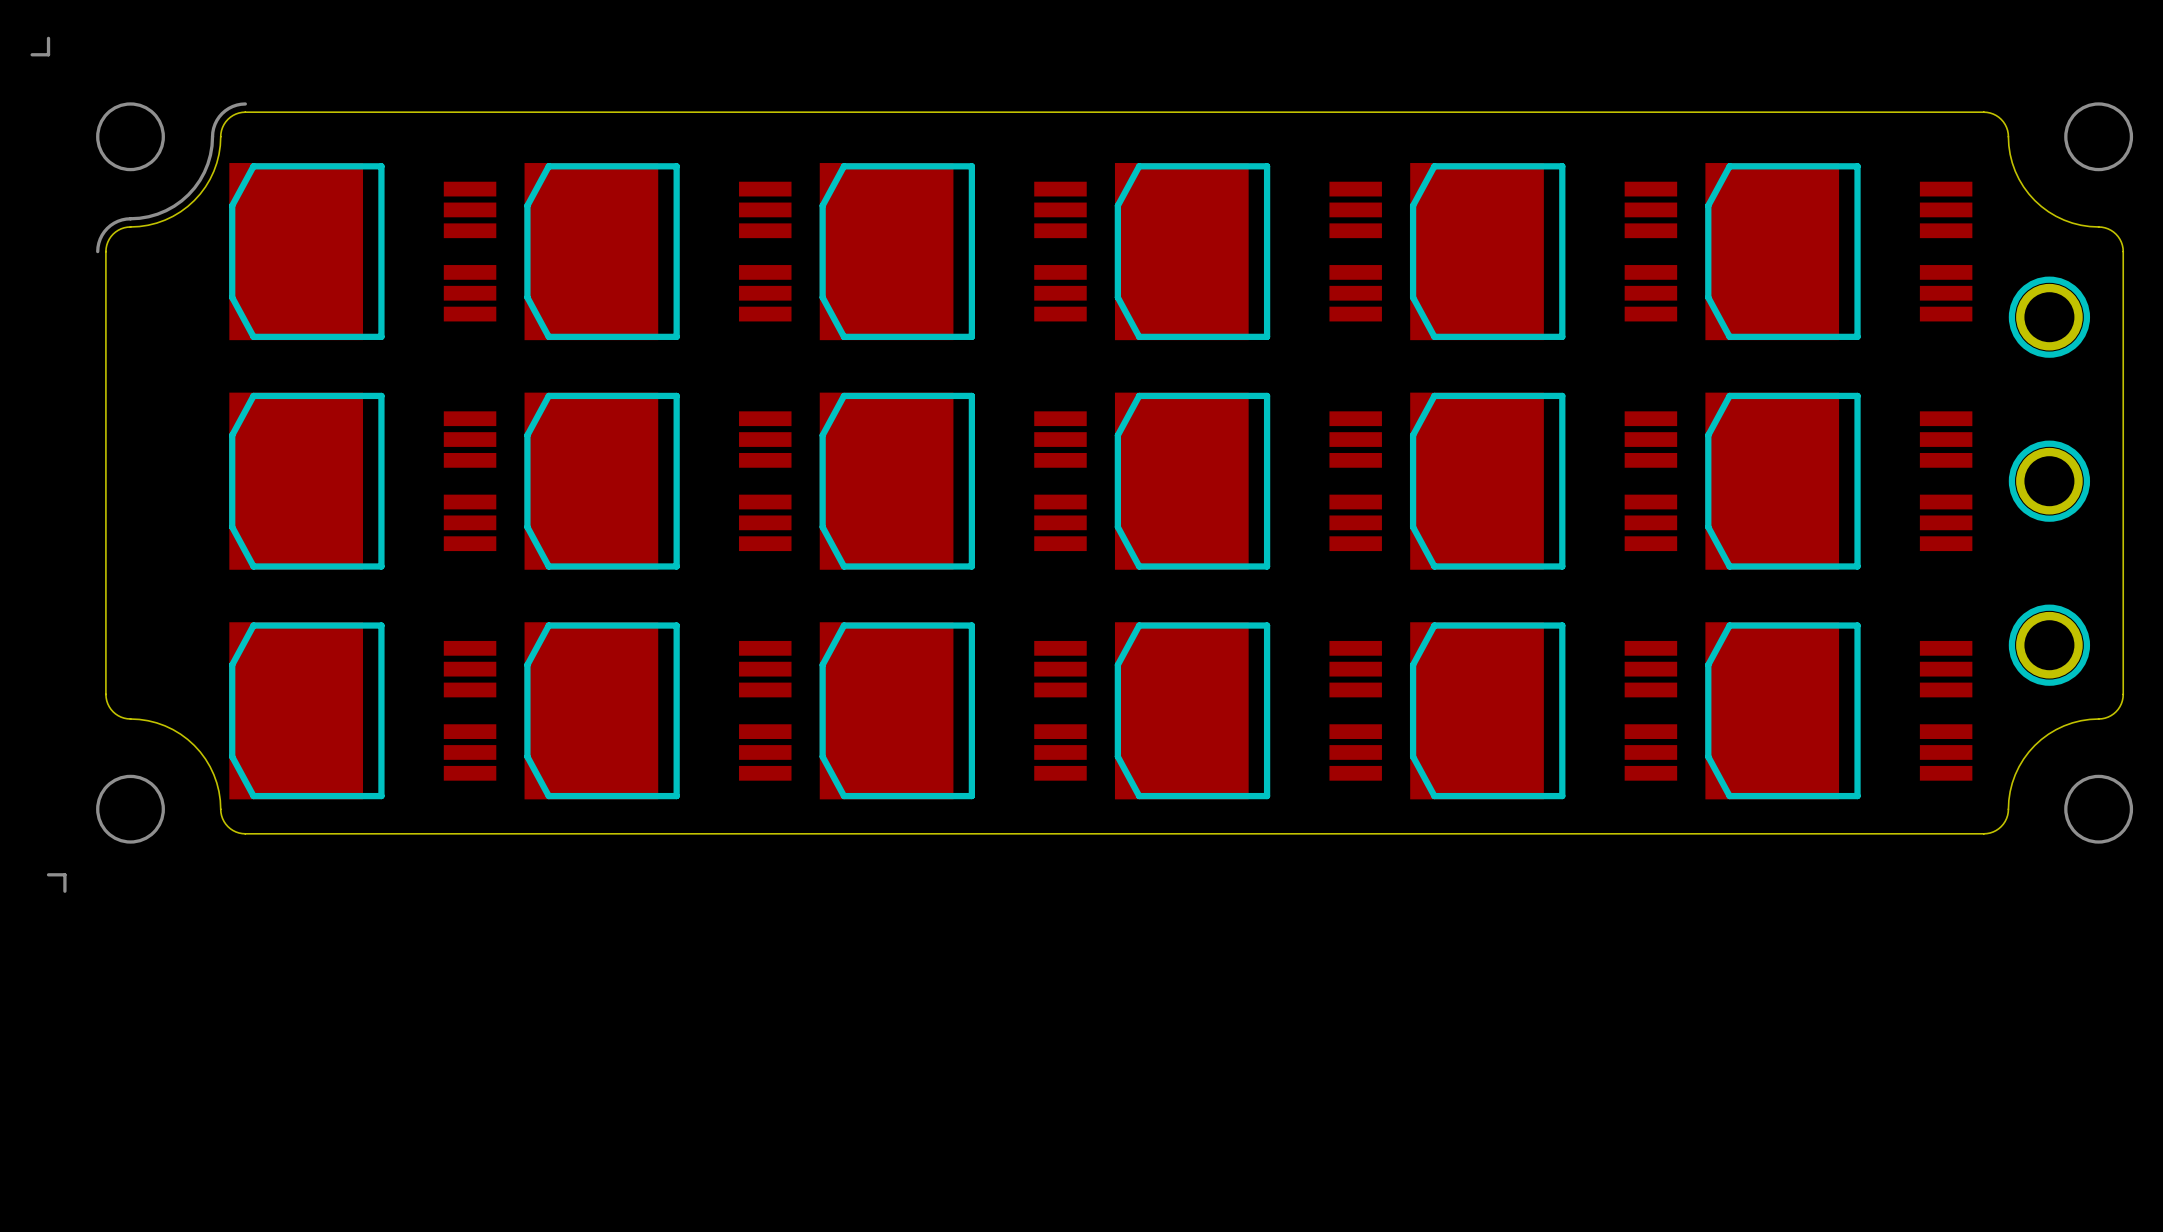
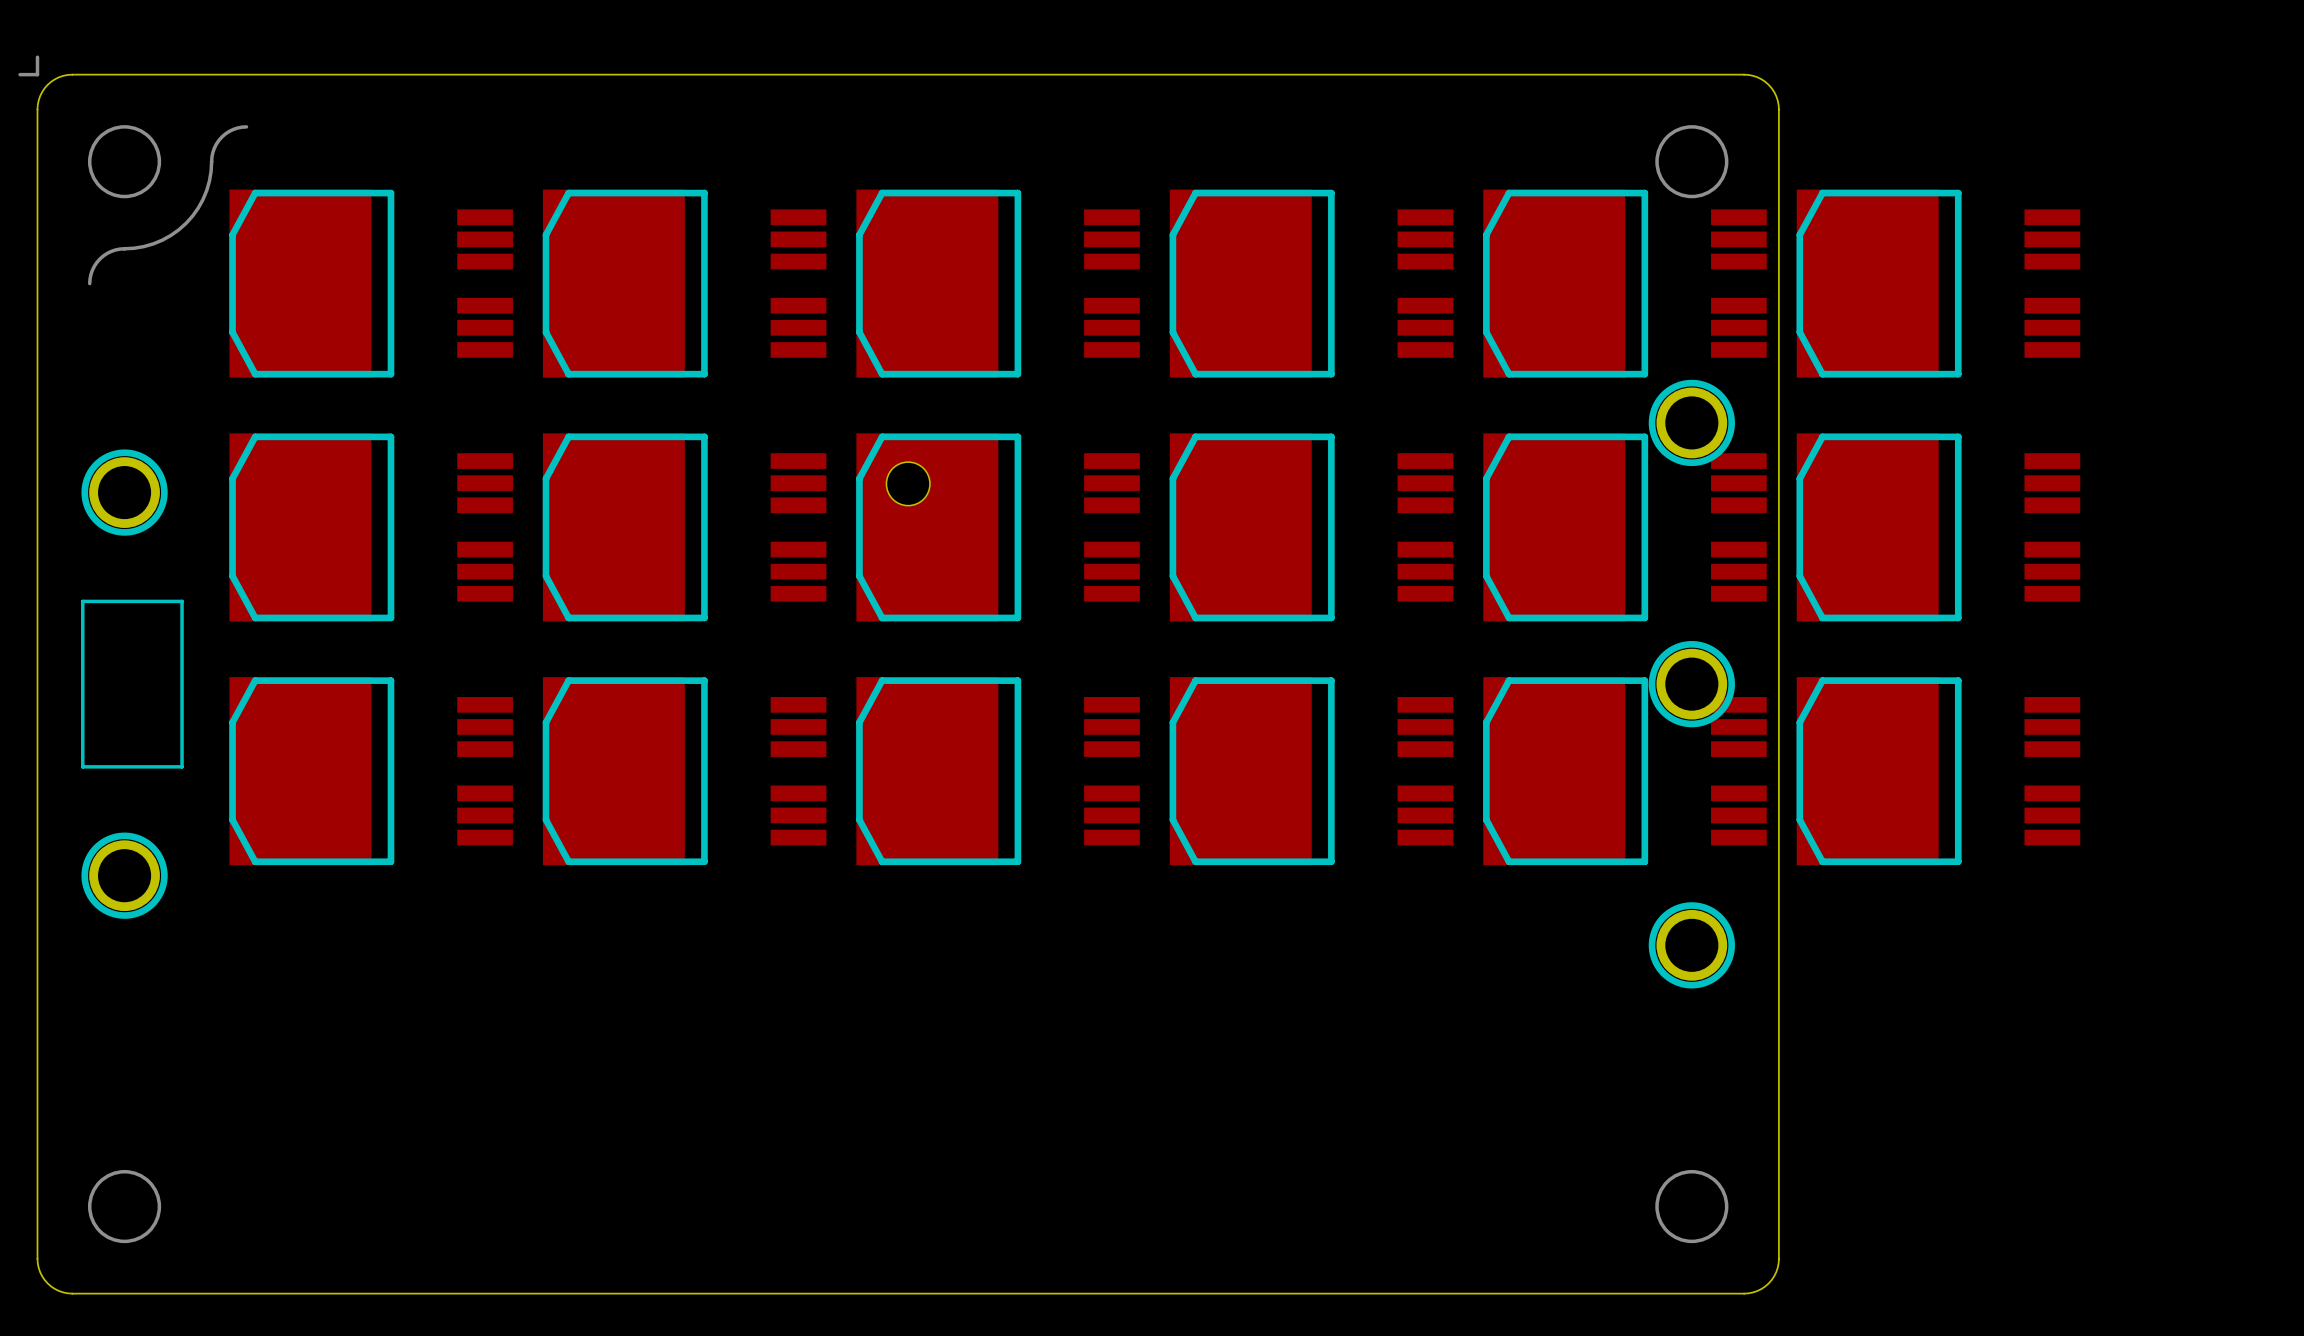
drawing: none -> [1655, 125, 1729, 199]
drawing: [2064, 102, 2134, 172] -> none
board edge: (245, 112) (1990, 113) (1998, 117) (2005, 124) (2015, 171) (2023, 186) (2034, 200) (2048, 211) (2064, 220) (2110, 230) (2118, 236) (2122, 245) (2122, 700) (2118, 709) (2110, 715) (2064, 725) (2048, 734) (2034, 745) (2023, 759) (2015, 774) (2005, 821) (1998, 828) (1987, 833) (238, 832) (230, 828) (224, 821) (213, 774) (205, 759) (194, 745) (180, 734) (165, 725) (118, 715) (111, 709) (106, 700) (105, 251) (109, 239) (118, 230) (165, 220) (180, 211) (194, 200) (205, 186) (213, 171) (224, 124) (233, 115) (245, 112) -> (72, 74) (58, 77) (47, 84) (40, 96) (37, 109) (37, 1258) (42, 1276) (51, 1286) (58, 1290) (72, 1293) (1744, 1293) (1757, 1290) (1771, 1280) (1776, 1272) (1778, 1258) (1778, 109) (1776, 96) (1765, 81) (1753, 75) (1744, 74) (72, 74)
part: (2049, 317) -> none
part: none -> (1691, 422)
part: none -> (908, 483)
part: none -> (124, 492)
part: (2049, 481) -> none
line: none -> (82, 601) (82, 766) (182, 766) (182, 601) (82, 601)
part: none -> (1691, 684)
part: (2049, 645) -> none
drawing: [2064, 774, 2134, 844] -> none
part: none -> (124, 875)
drawing position: (130, 809) -> (124, 1206)
line: (48, 874) (64, 874) (64, 891) -> none
part: none -> (1691, 945)
drawing: none -> [1655, 1169, 1729, 1244]

